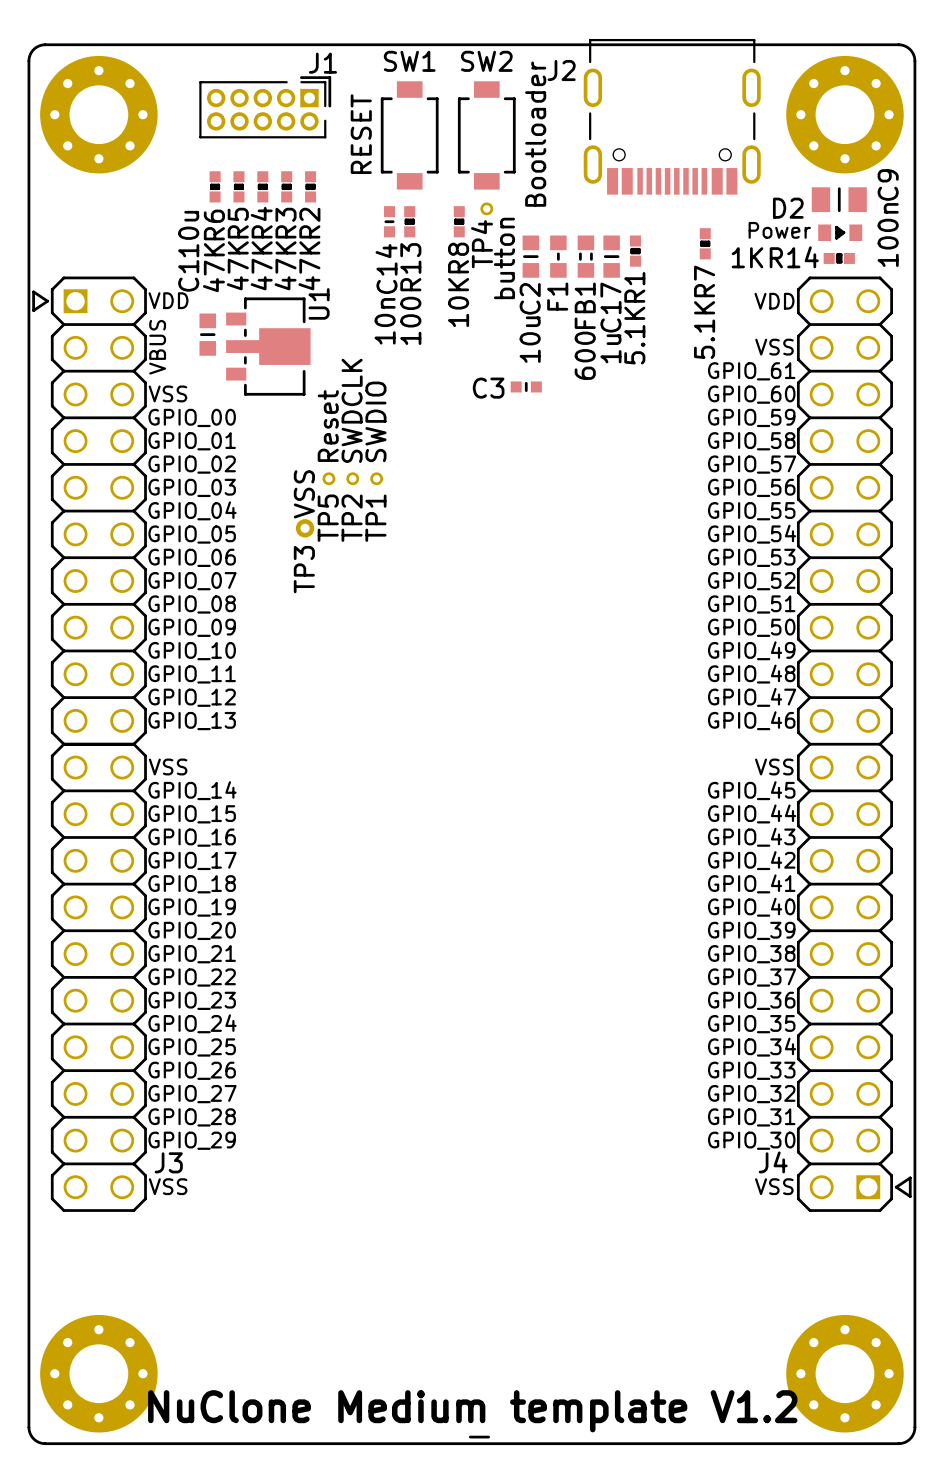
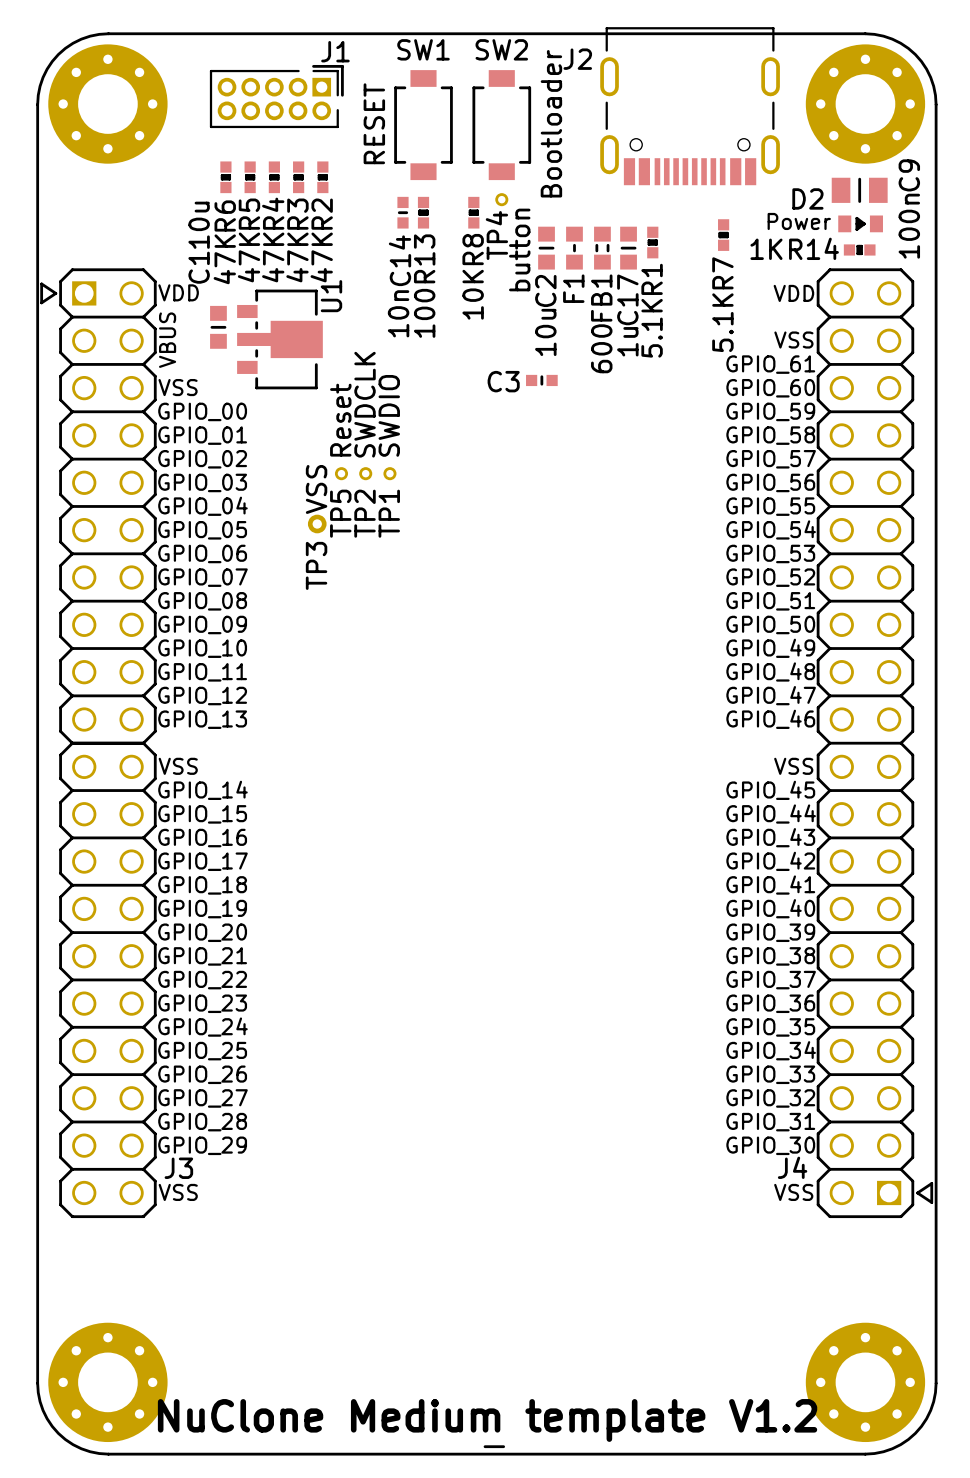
board edge: (45, 44) (898, 44) (906, 46) (912, 52) (914, 61) (914, 1427) (912, 1435) (906, 1441) (898, 1443) (45, 1443) (37, 1441) (31, 1435) (28, 1427) (28, 61) (33, 49) (45, 44) -> (108, 33) (81, 39) (58, 54) (43, 77) (37, 104) (37, 1383) (40, 1401) (47, 1418) (58, 1433) (73, 1444) (90, 1451) (108, 1454) (865, 1454) (883, 1451) (900, 1444) (915, 1433) (926, 1418) (933, 1401) (936, 1383) (936, 104) (933, 86) (926, 69) (915, 54) (900, 43) (883, 36) (865, 33) (108, 33)

